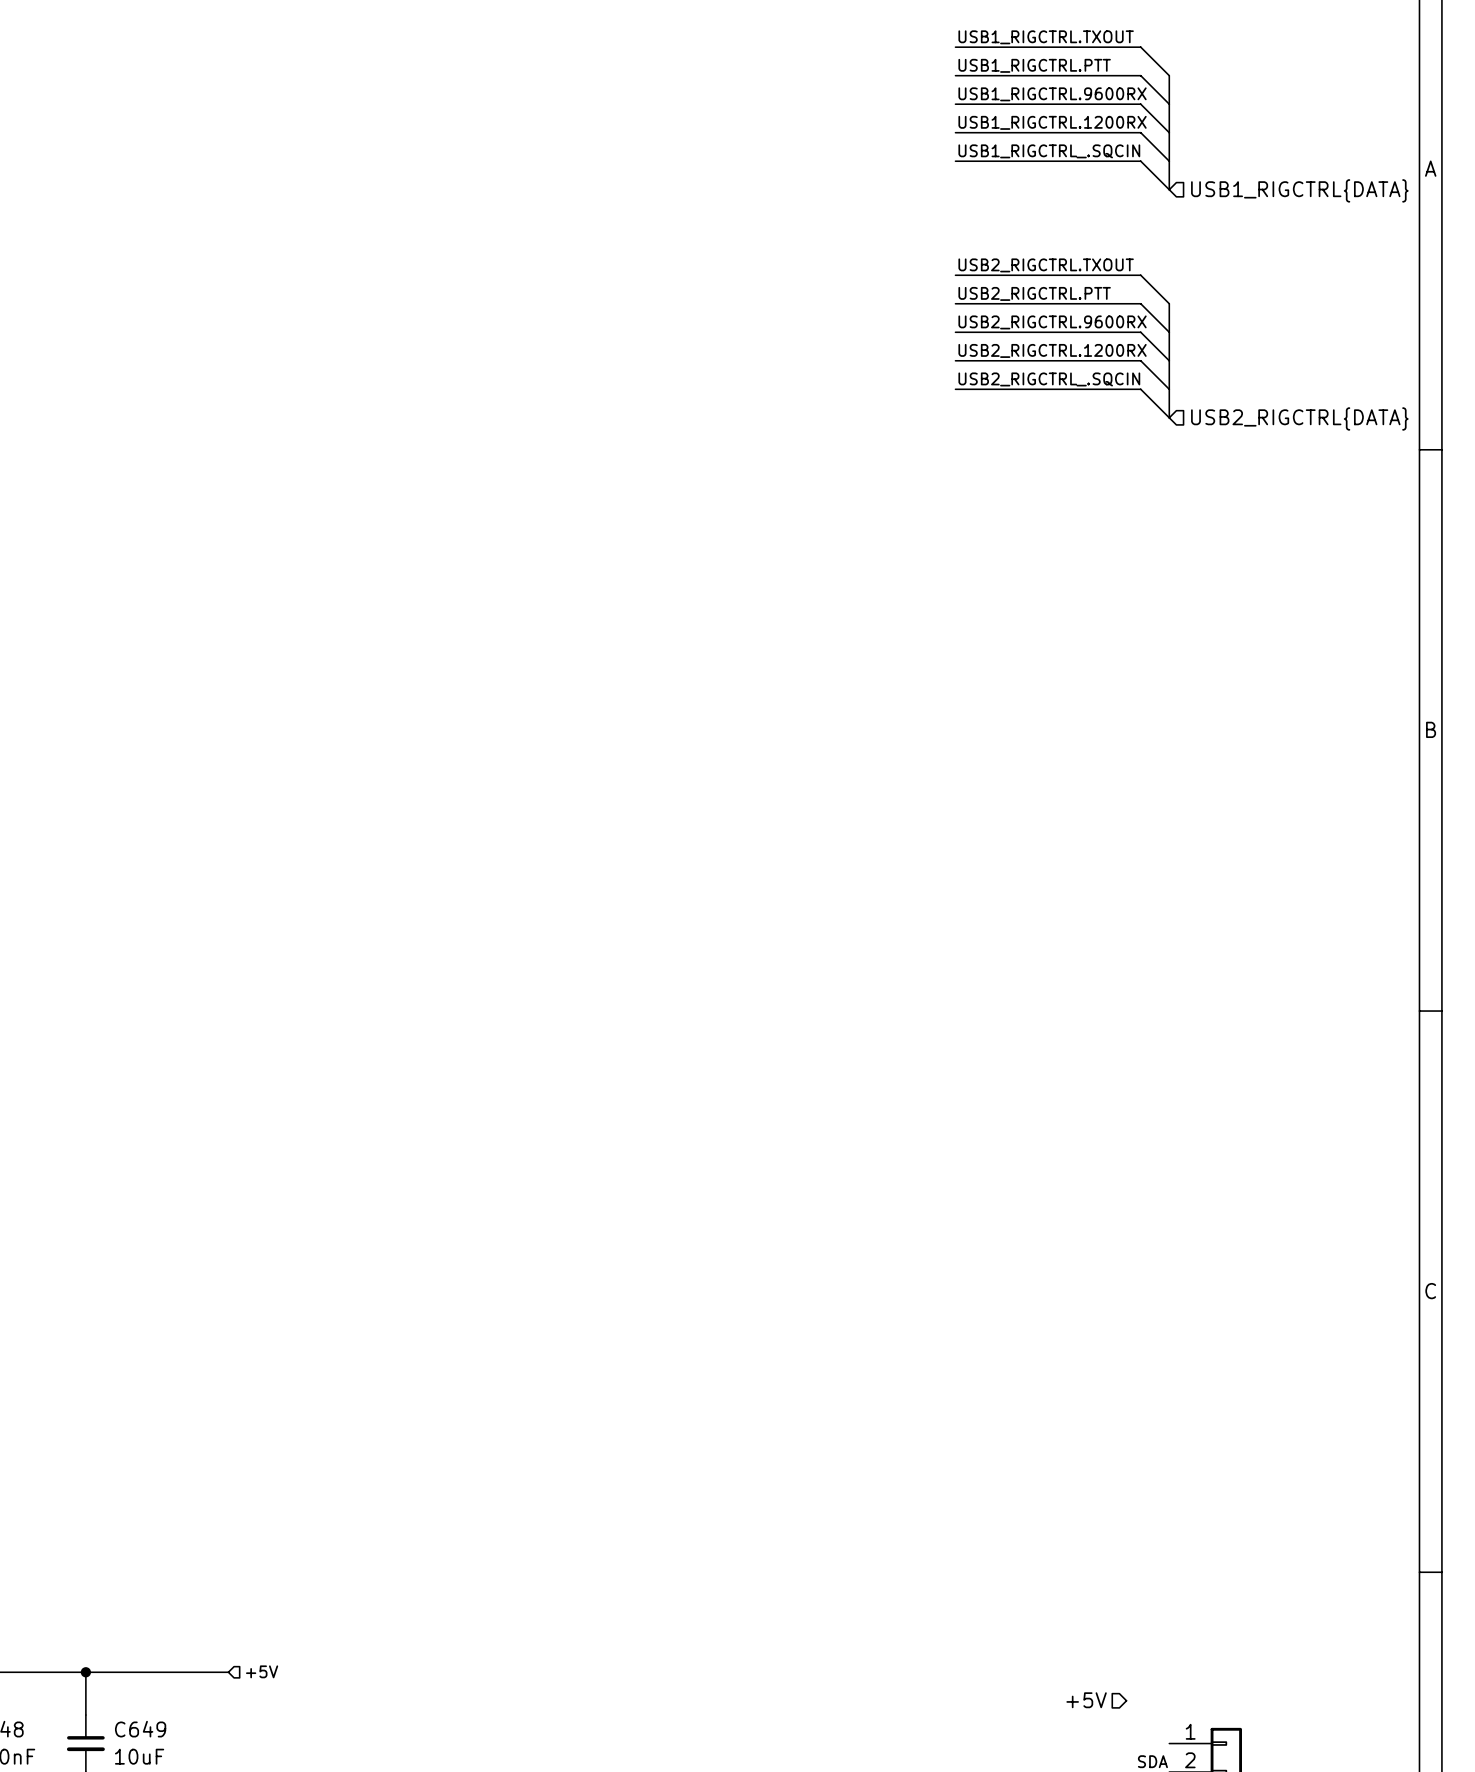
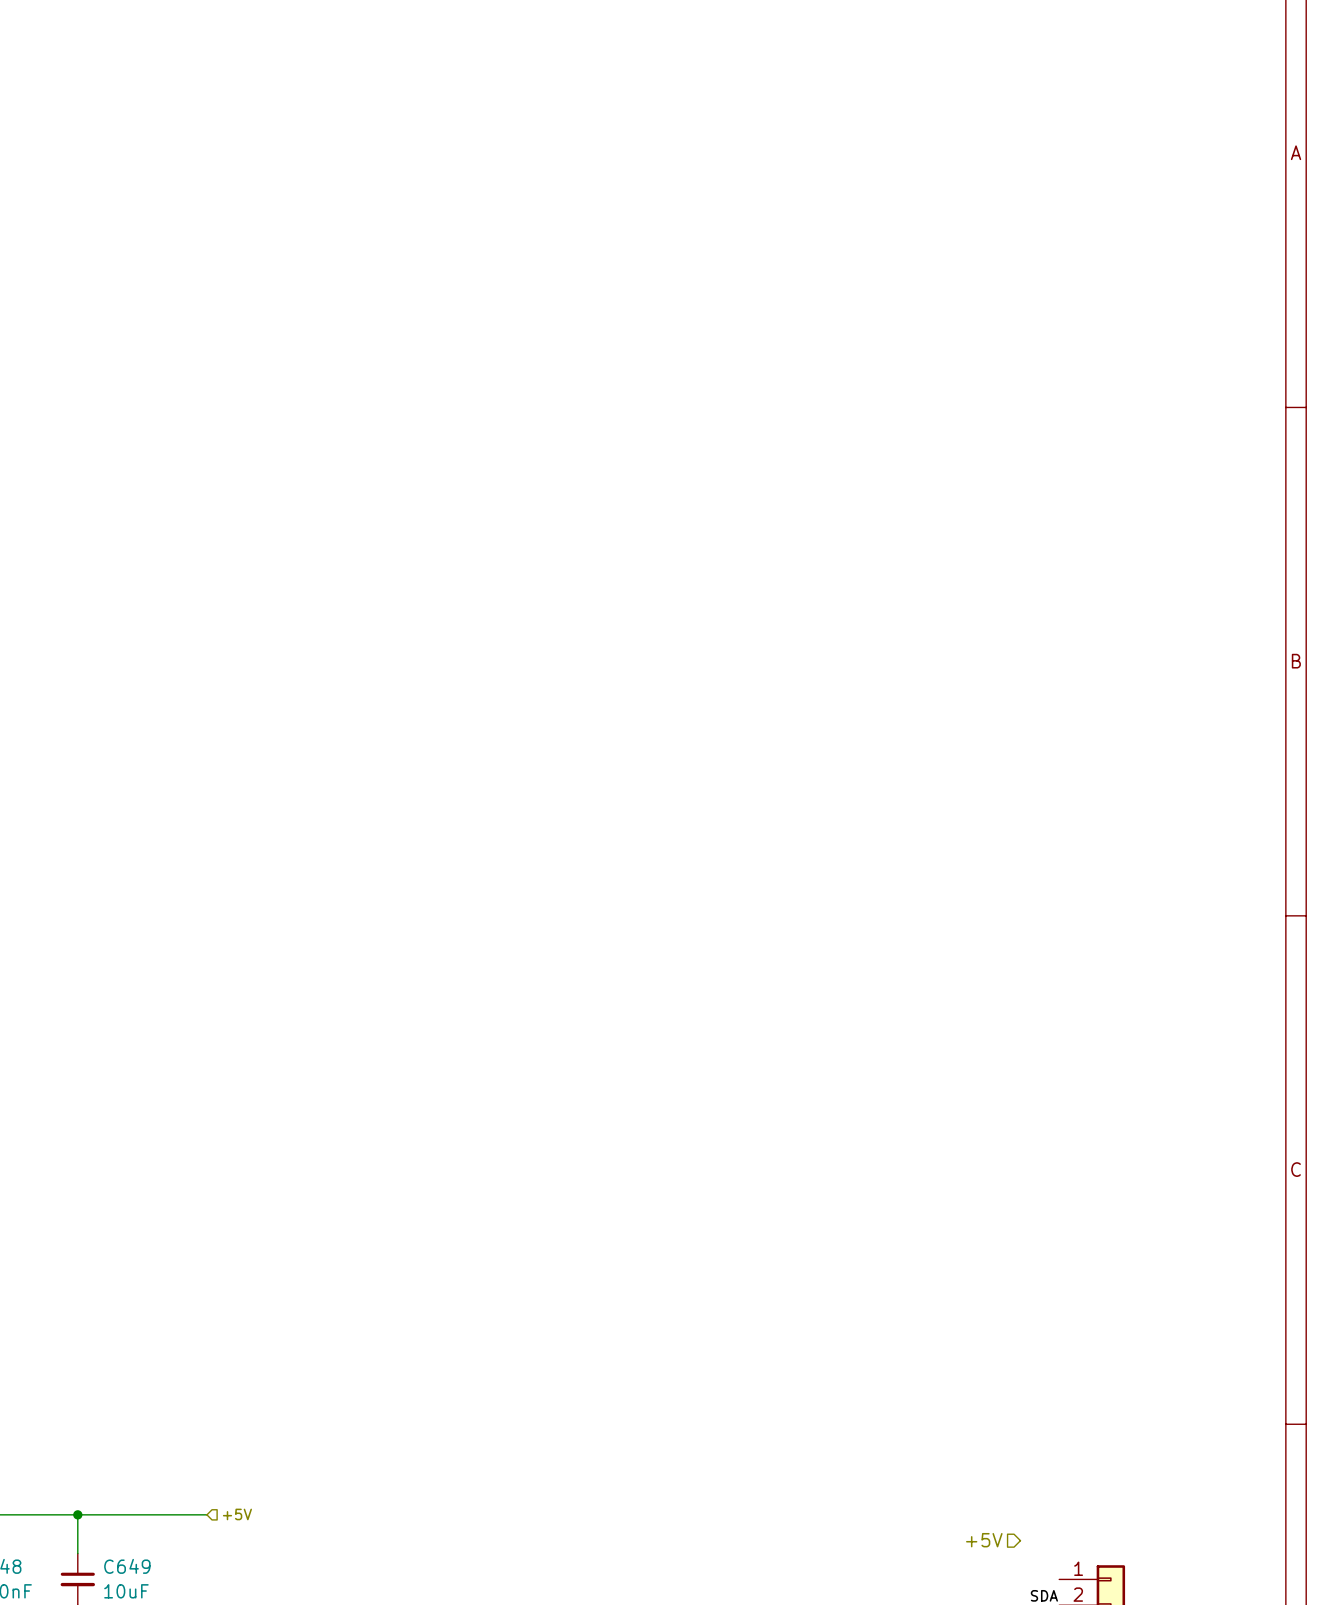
label: USB1_RIGCTRL.TXOUT (1046, 37) -> none
wire: (955, 47) (1140, 47) (1169, 75) -> none
label: USB1_RIGCTRL.PTT (1034, 65) -> none
wire: (955, 75) (1140, 75) (1169, 104) -> none
bus: (1169, 75) (1169, 189) -> none
label: USB1_RIGCTRL.9600RX (1052, 94) -> none
wire: (955, 104) (1140, 104) (1169, 132) -> none
label: USB1_RIGCTRL.1200RX (1052, 122) -> none
wire: (955, 132) (1140, 132) (1169, 161) -> none
label: USB1_RIGCTRL_.SQCIN (1049, 151) -> none
wire: (955, 161) (1140, 161) (1169, 189) -> none
hierarchical label: USB1_RIGCTRL{DATA} (1299, 190) -> none
label: USB2_RIGCTRL.TXOUT (1046, 265) -> none
wire: (955, 275) (1140, 275) (1169, 303) -> none
label: USB2_RIGCTRL.PTT (1034, 293) -> none
wire: (955, 303) (1140, 303) (1169, 332) -> none
bus: (1169, 303) (1169, 417) -> none
label: USB2_RIGCTRL.9600RX (1052, 322) -> none
wire: (955, 332) (1140, 332) (1169, 360) -> none
label: USB2_RIGCTRL.1200RX (1052, 350) -> none
wire: (955, 360) (1140, 360) (1169, 389) -> none
label: USB2_RIGCTRL_.SQCIN (1049, 379) -> none
wire: (955, 389) (1140, 389) (1169, 417) -> none
hierarchical label: USB2_RIGCTRL{DATA} (1299, 418) -> none

